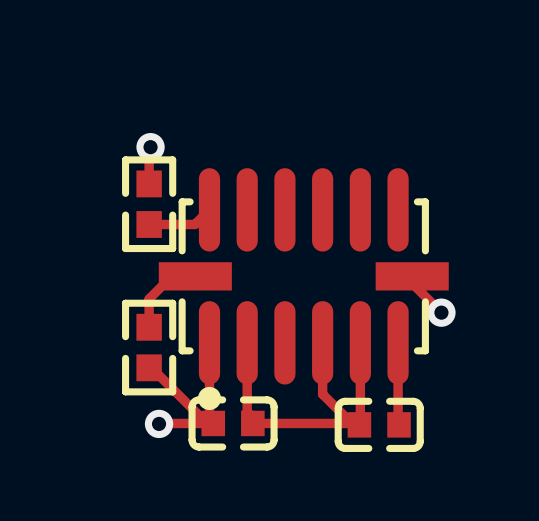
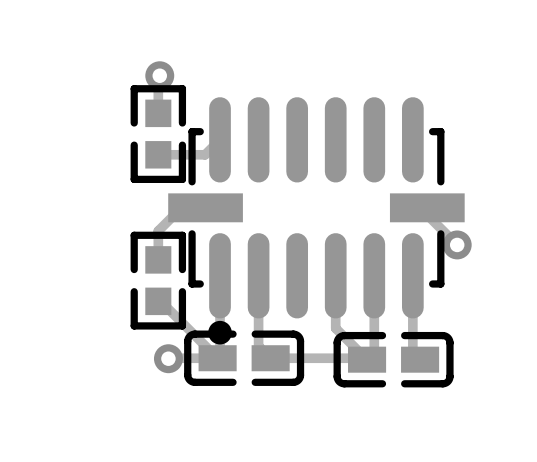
part footprint: [188, 396, 278, 451] -> [184, 330, 305, 386]
part footprint: [334, 397, 424, 452] -> [333, 331, 454, 388]

